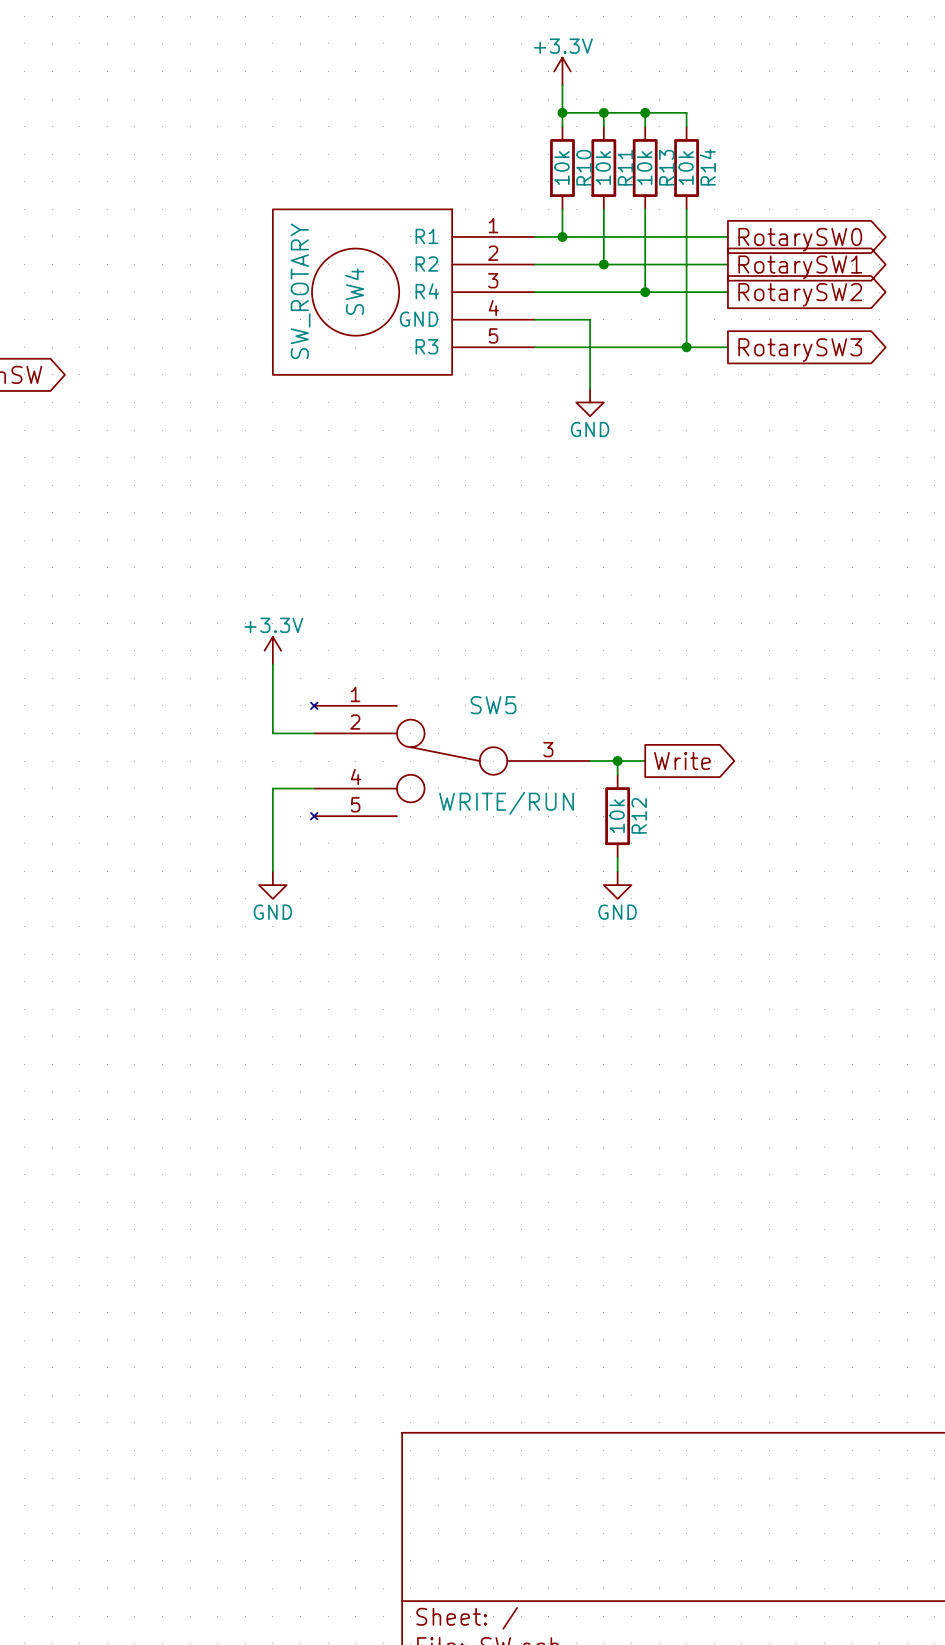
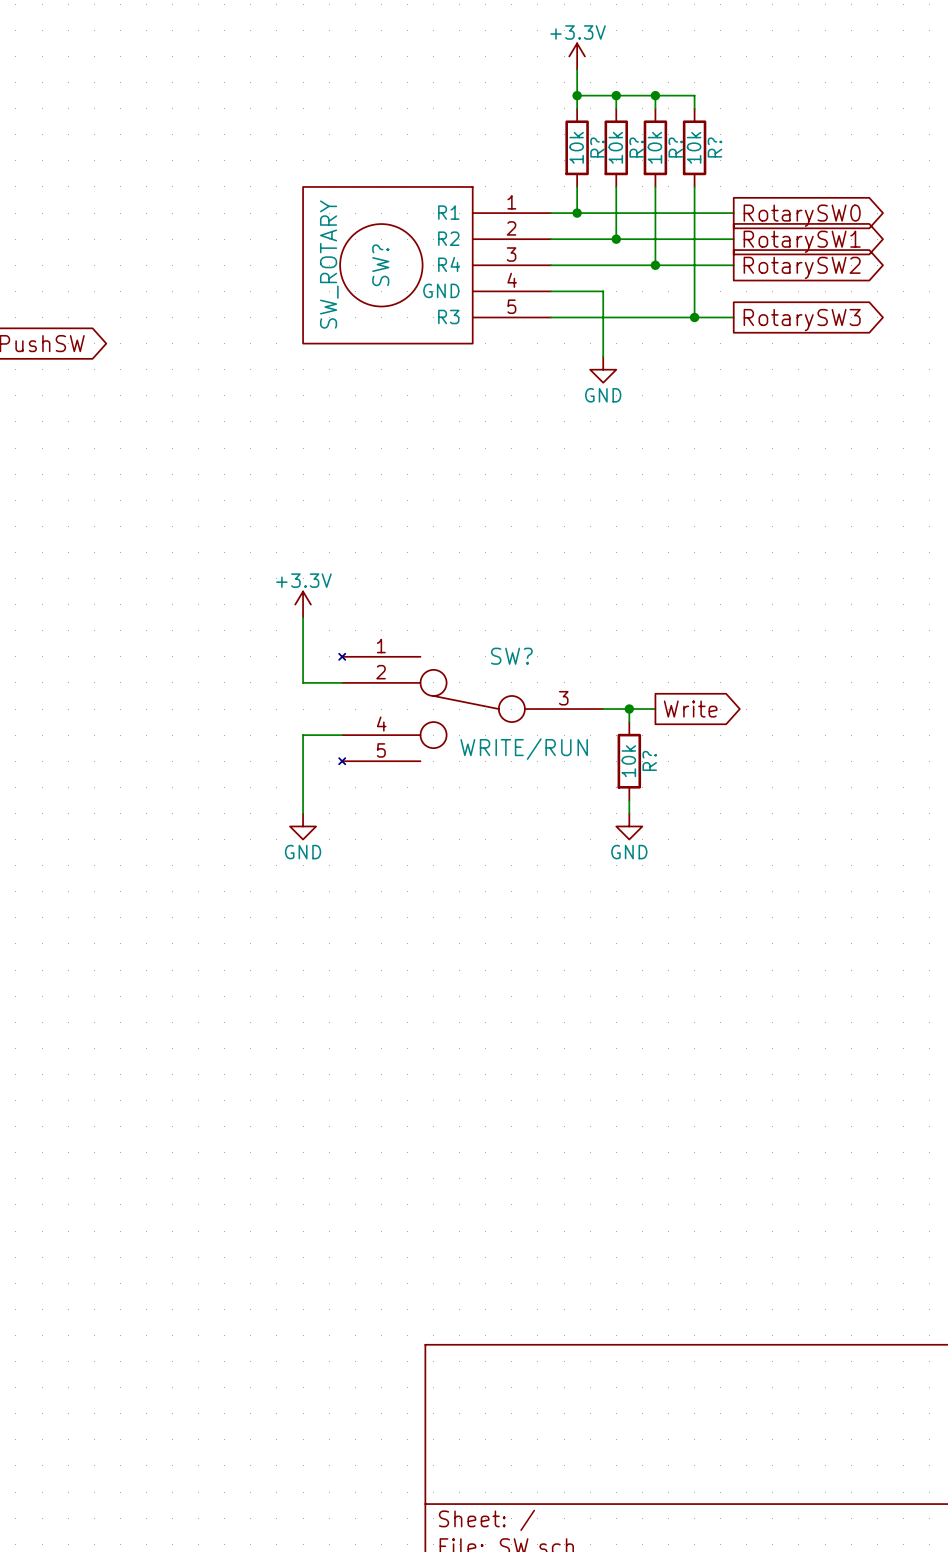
R10 name: R10 (584, 167) -> R? (597, 147)
R11 name: R11 (625, 167) -> R? (636, 147)
R13 name: R13 (666, 167) -> R? (675, 147)
R14 name: R14 (707, 167) -> R? (714, 147)
SW4 name: SW4 (354, 291) -> SW? (380, 265)
SW5 name: SW5 (493, 705) -> SW? (511, 656)
R12 name: R12 (639, 815) -> R? (649, 760)

